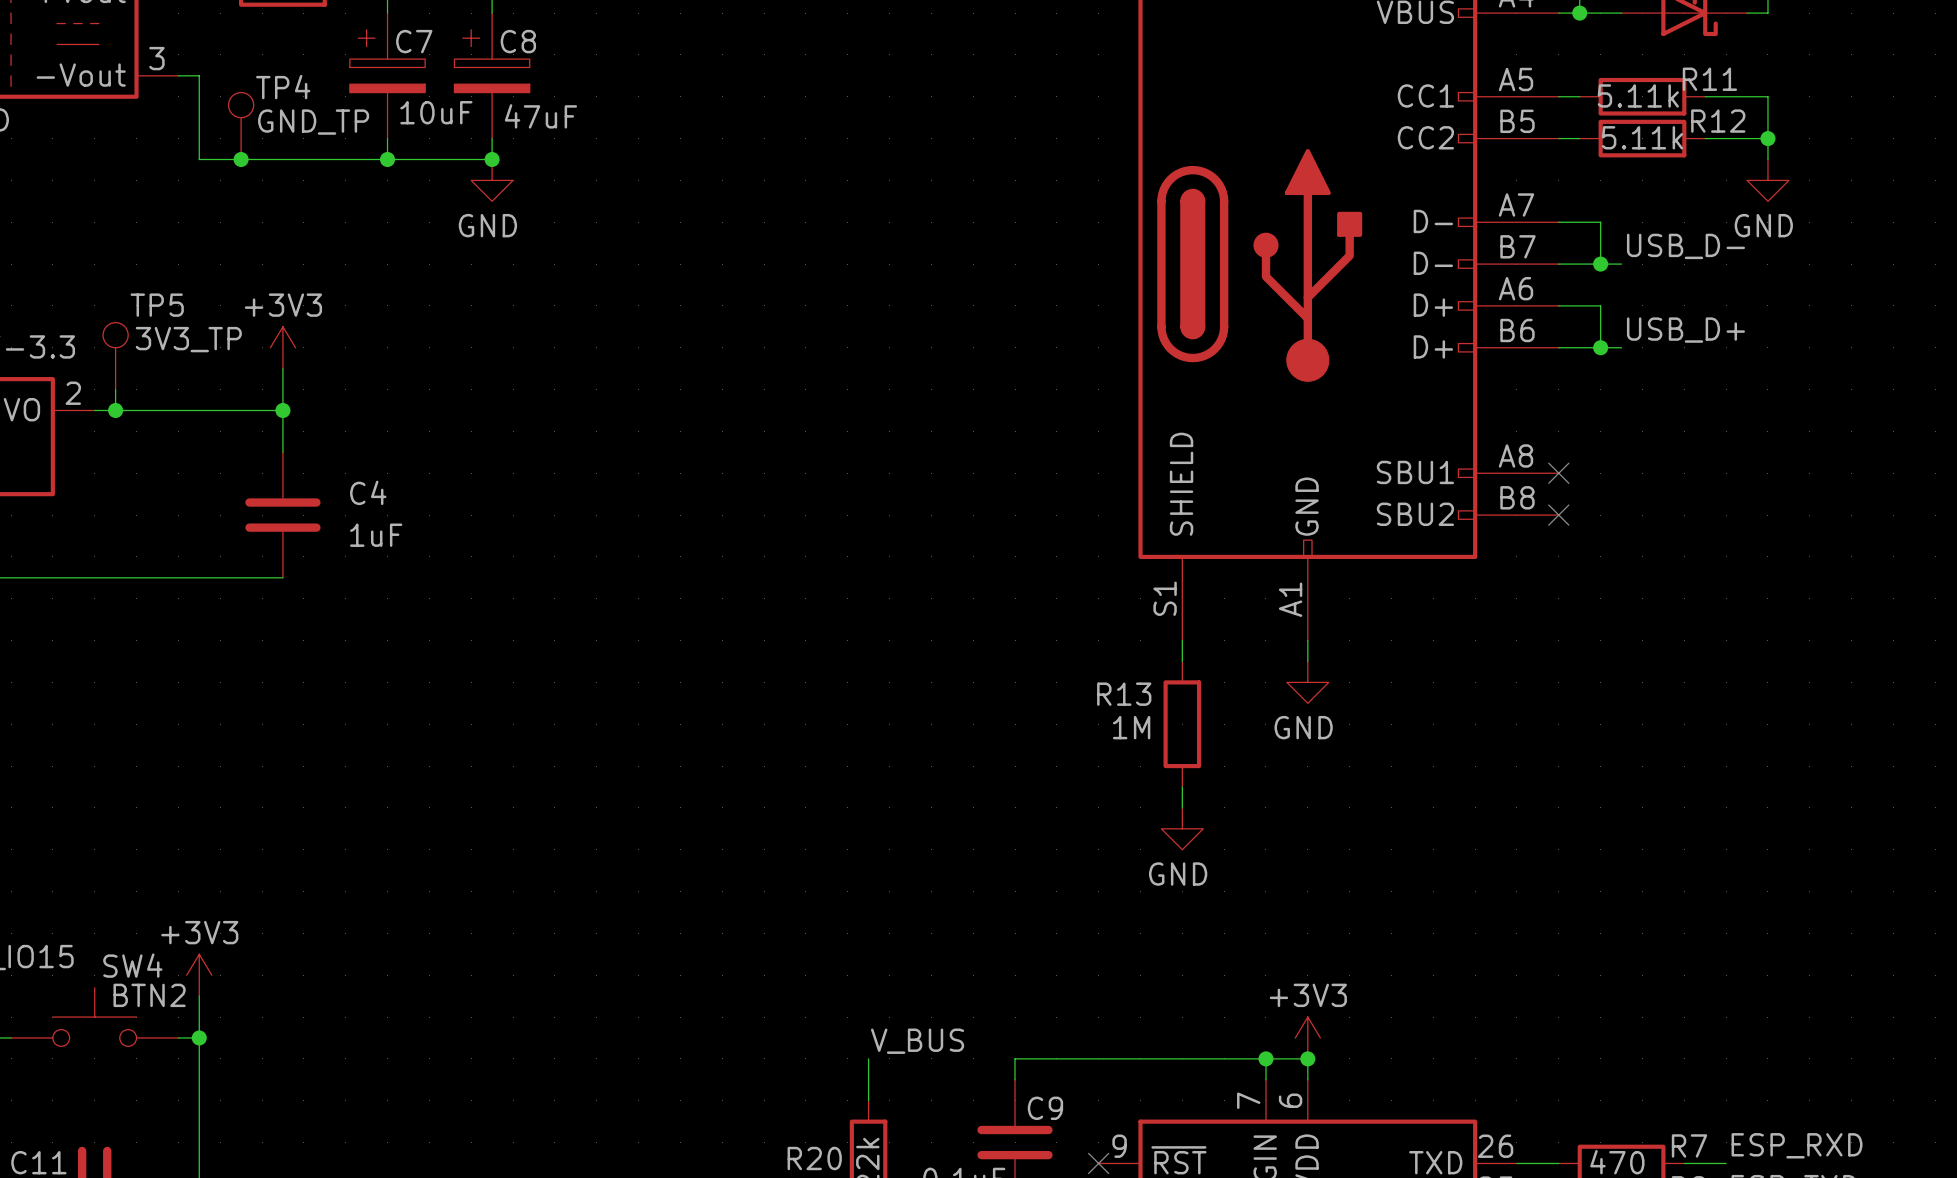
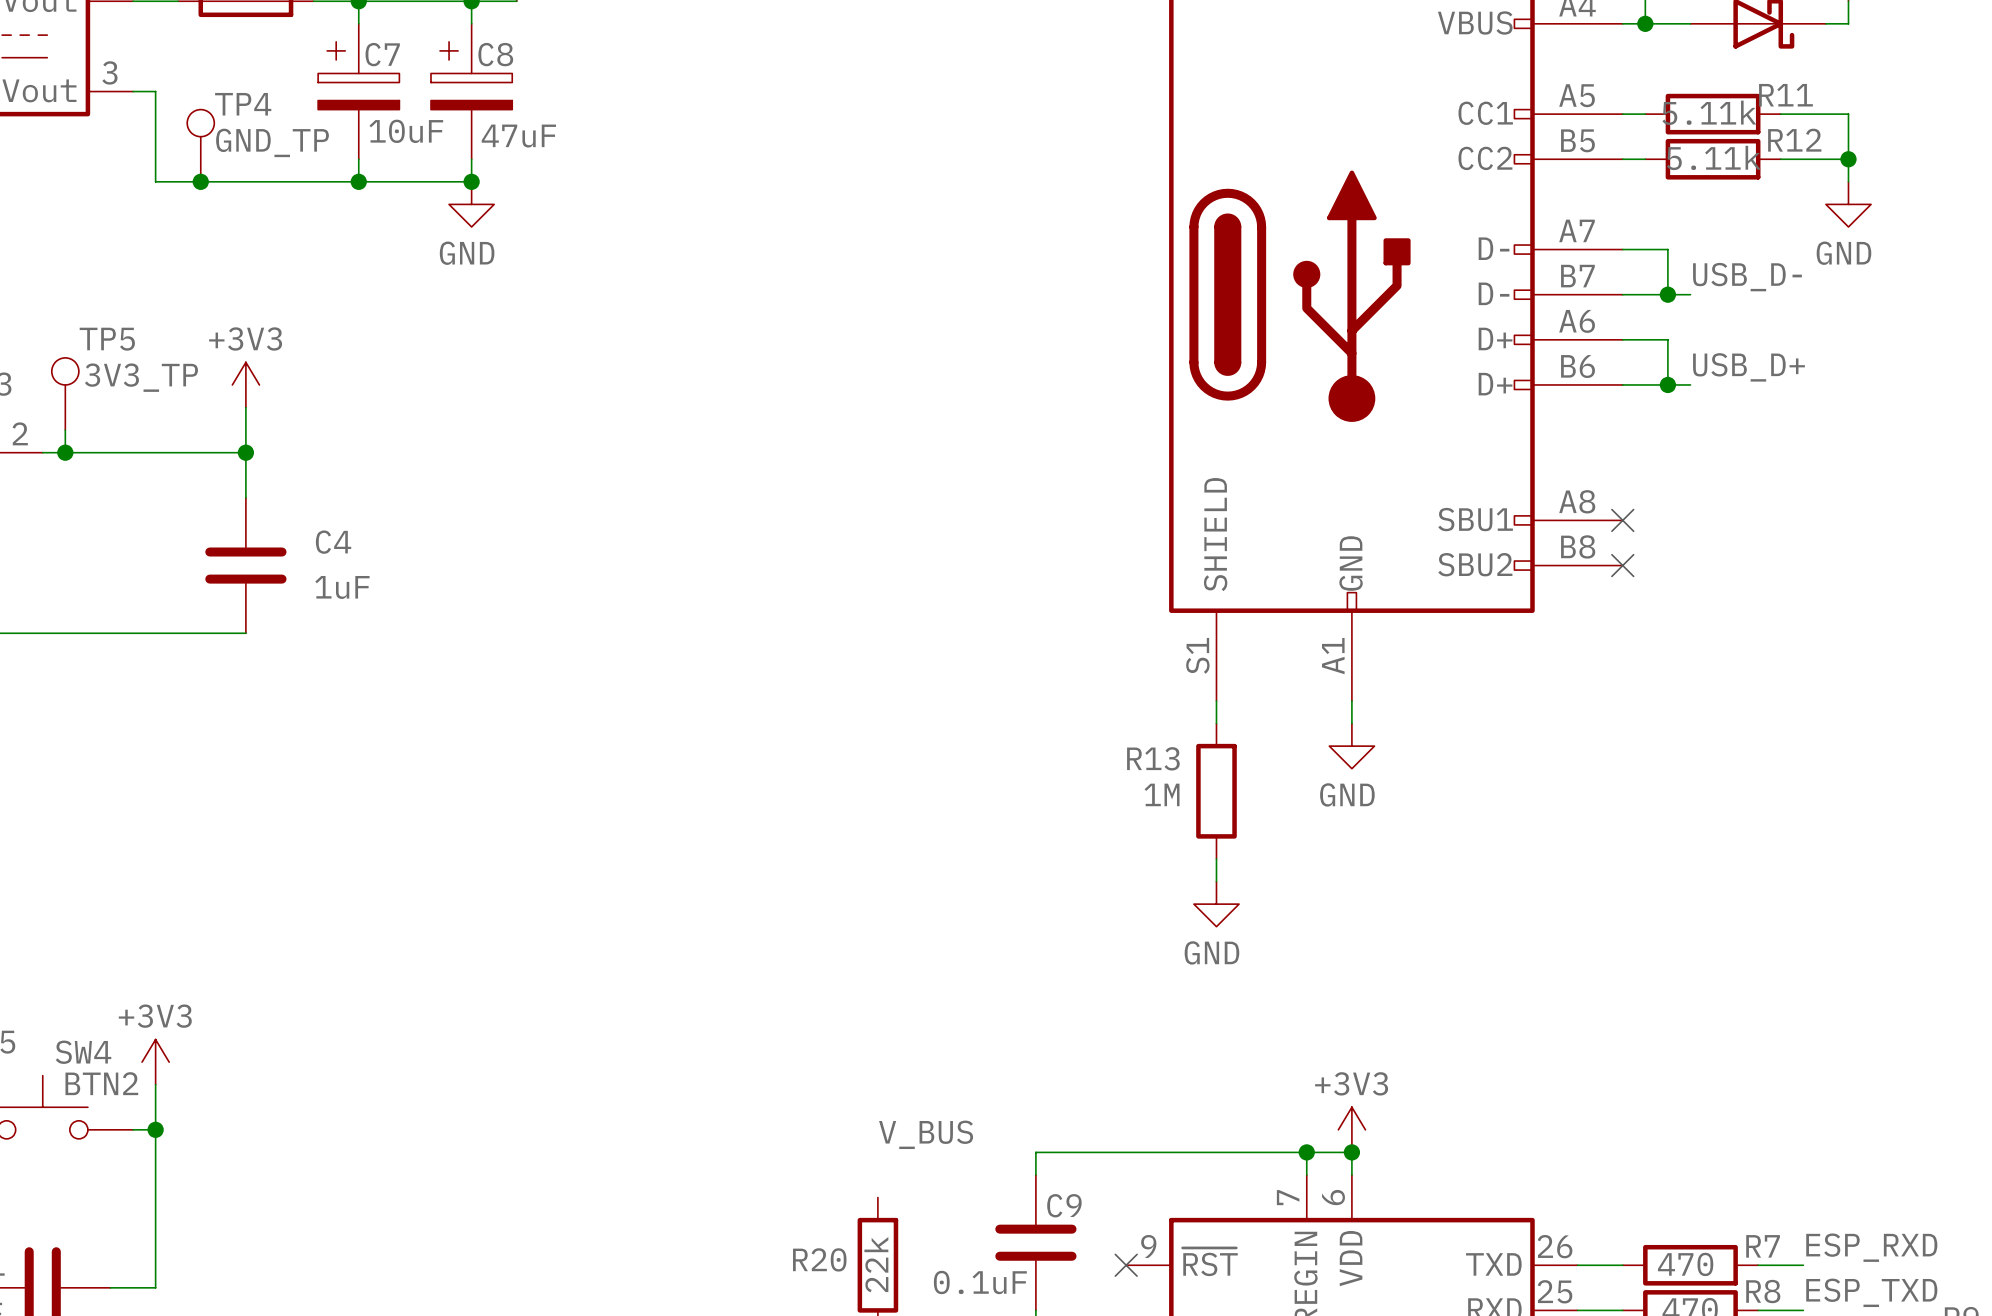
wire: (868, 1058) (868, 1100) -> none

